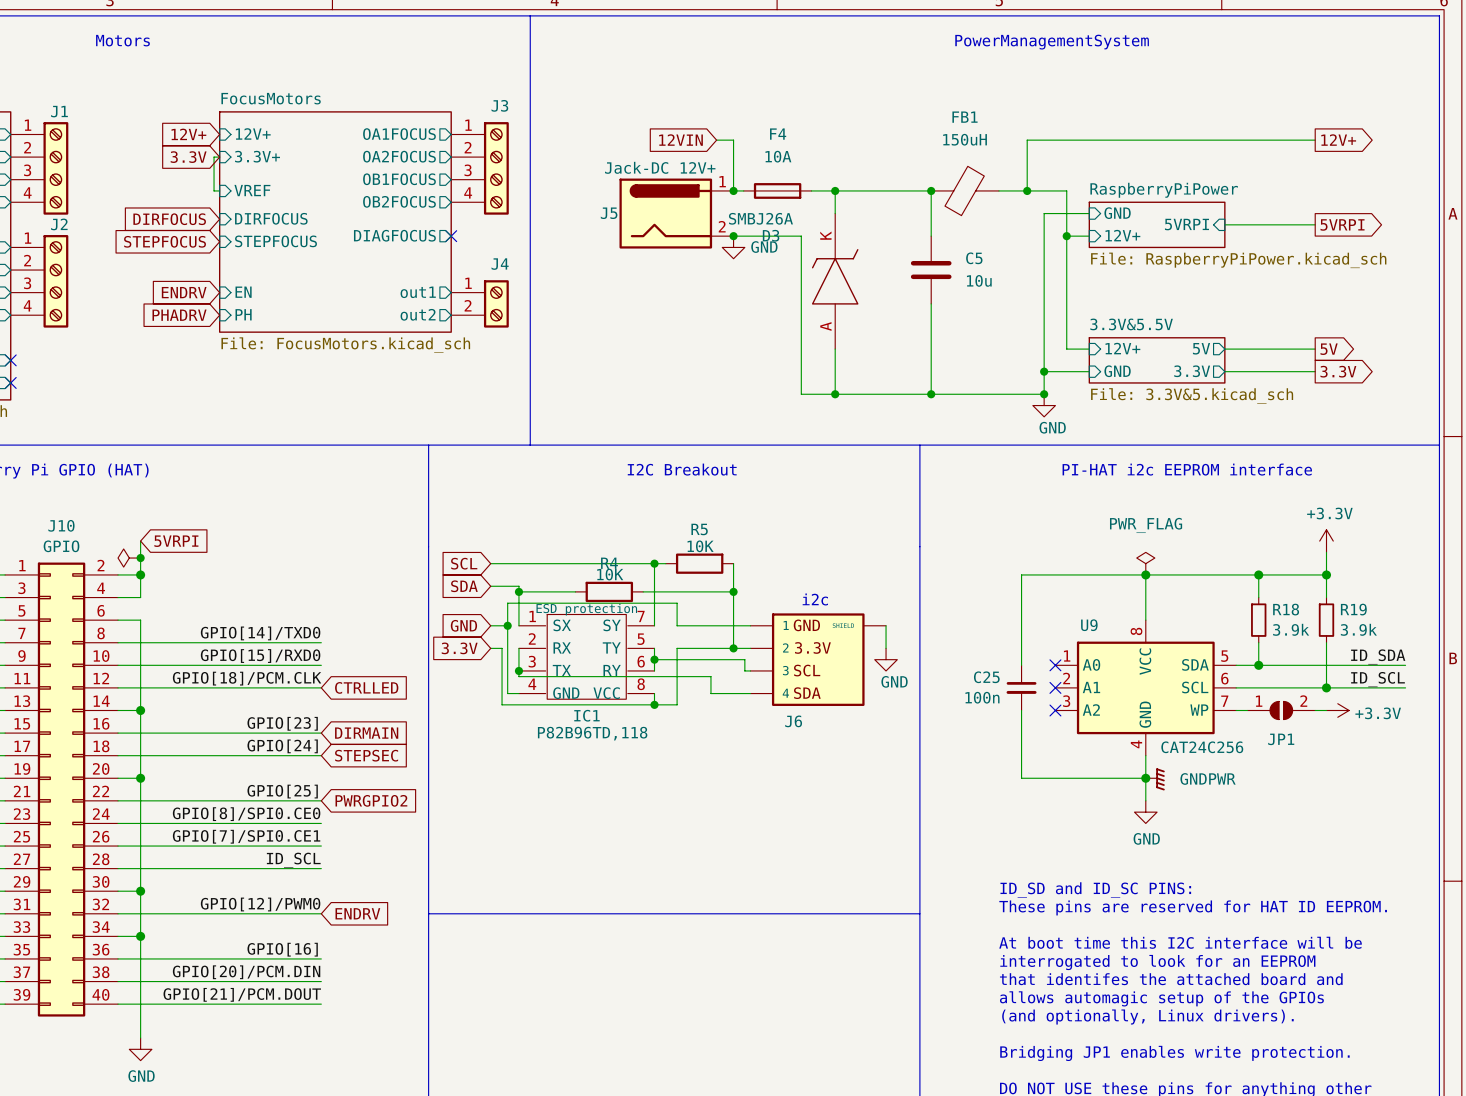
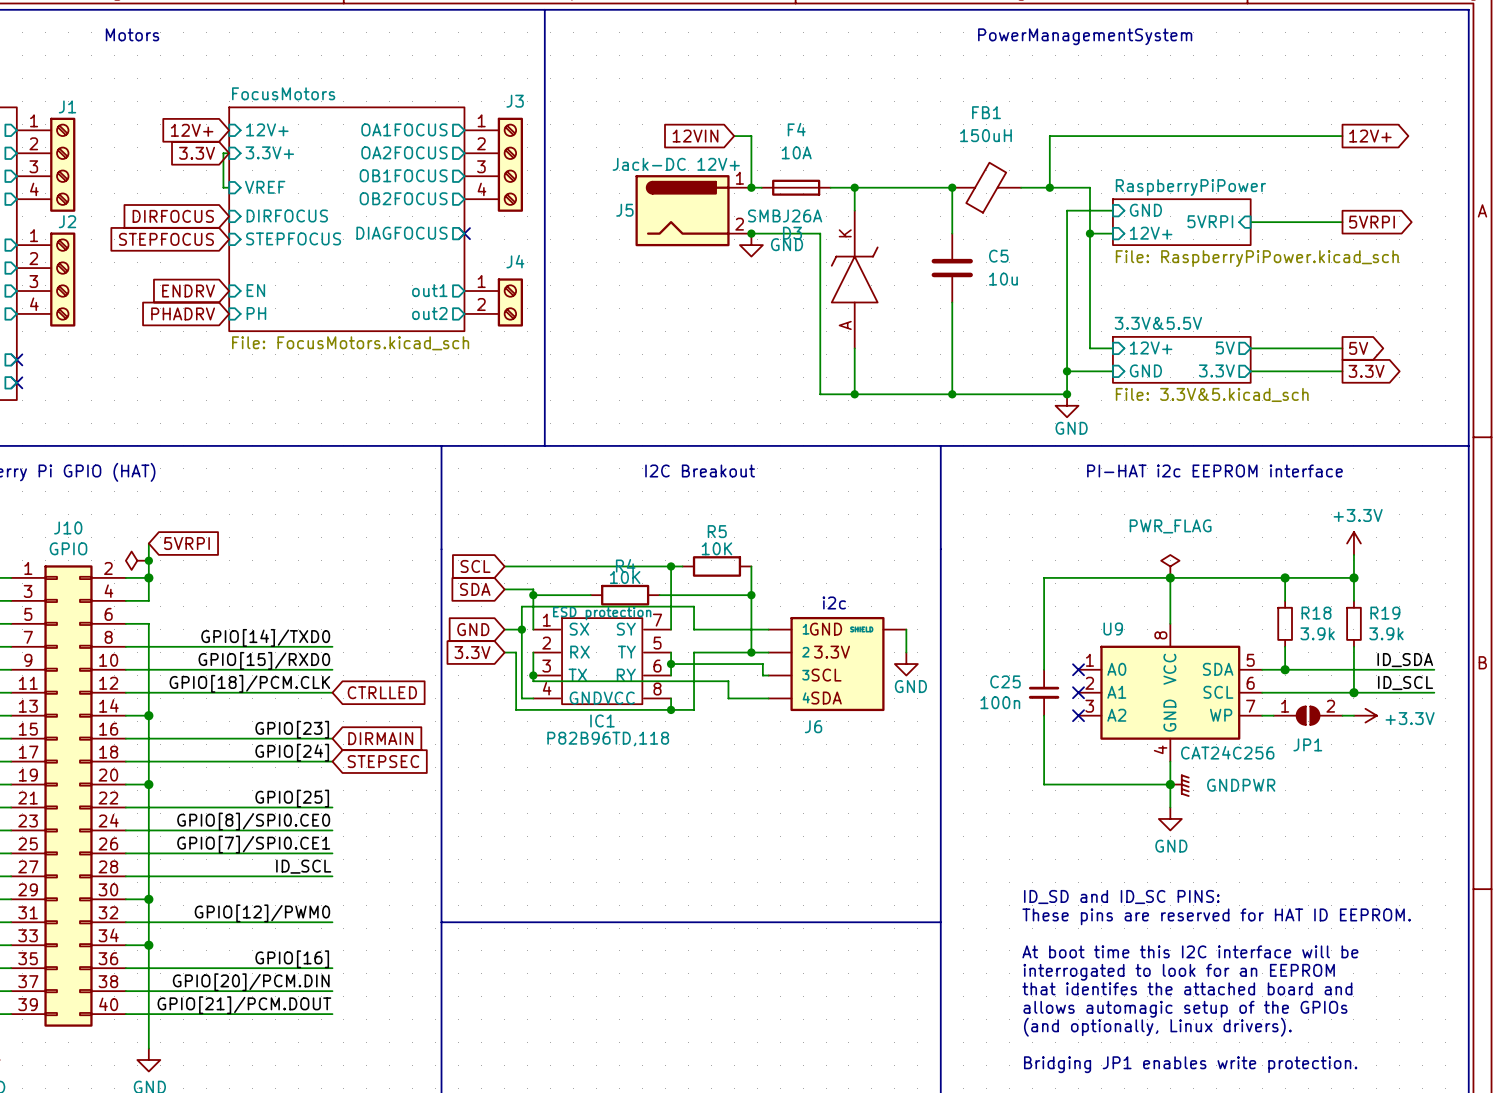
global label: PWRGPIO2 (371, 800) -> none
global label: ENDRV (357, 913) -> none

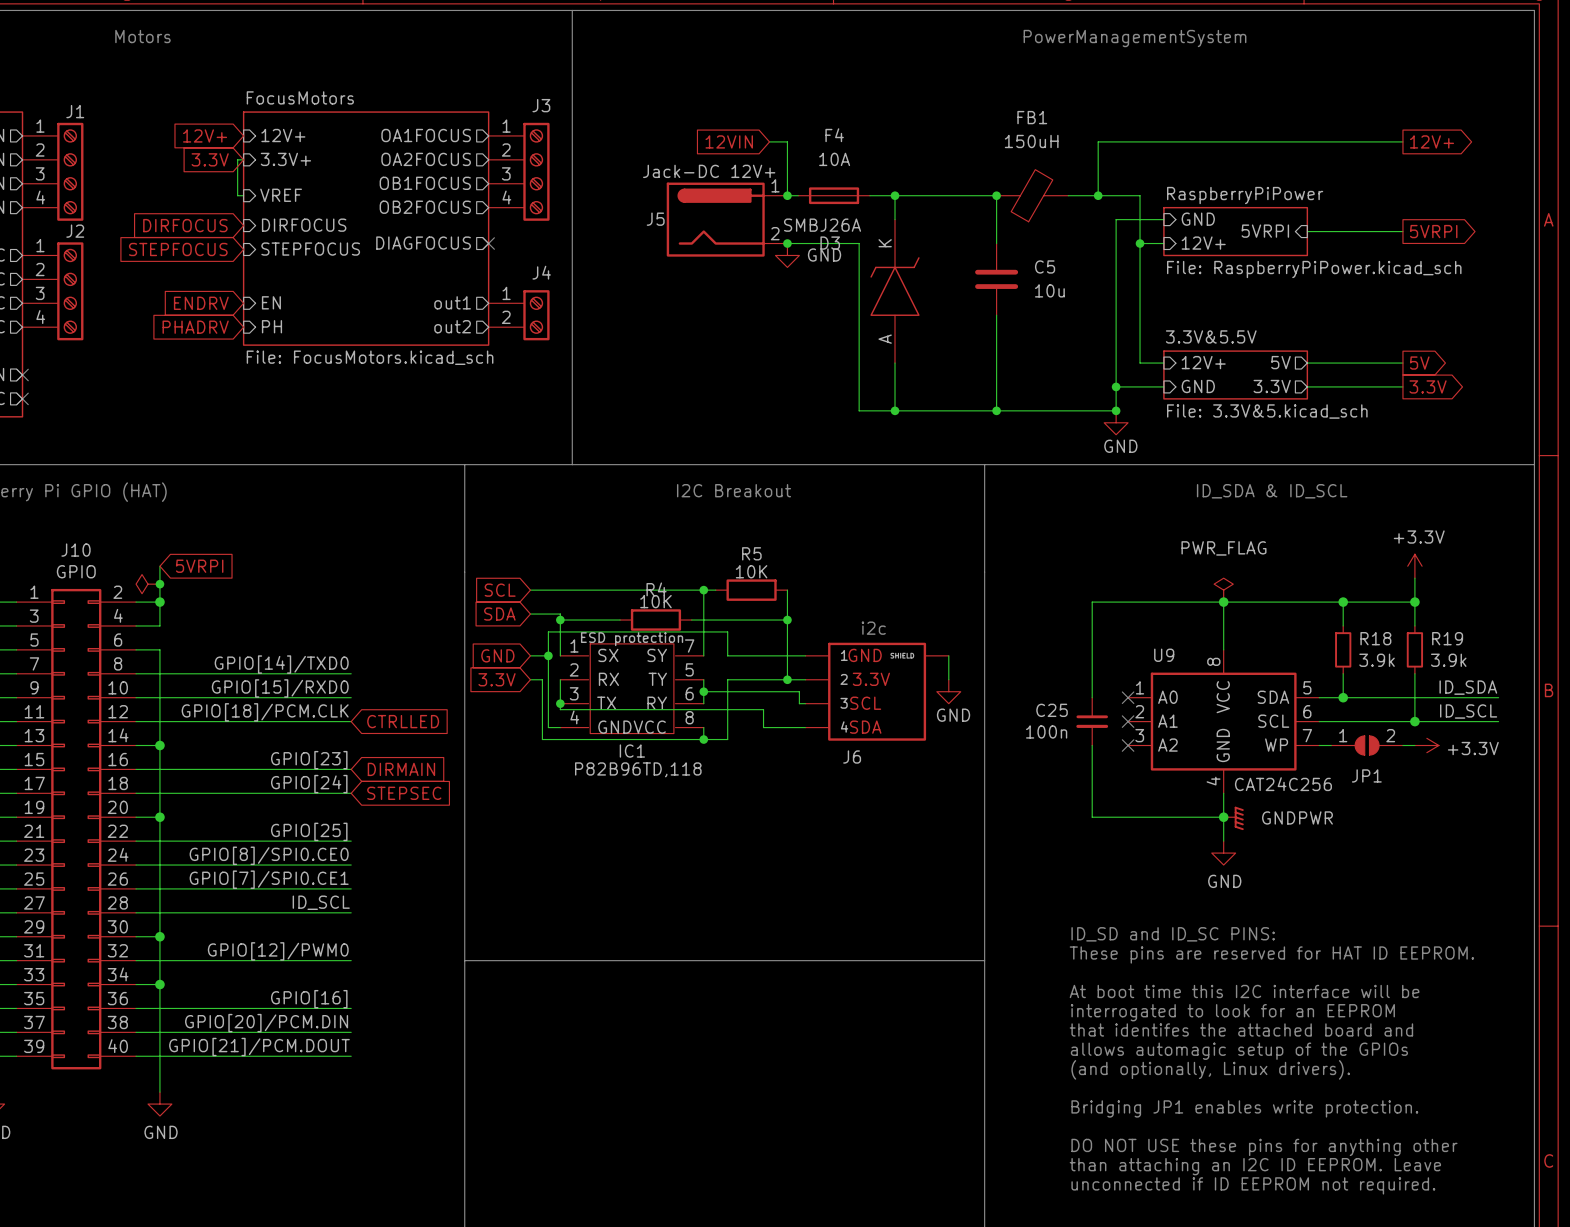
text: PI-HAT i2c EEPROM interface (1214, 470) -> none
text: none -> ID_SDA & ID_SCL (1272, 491)

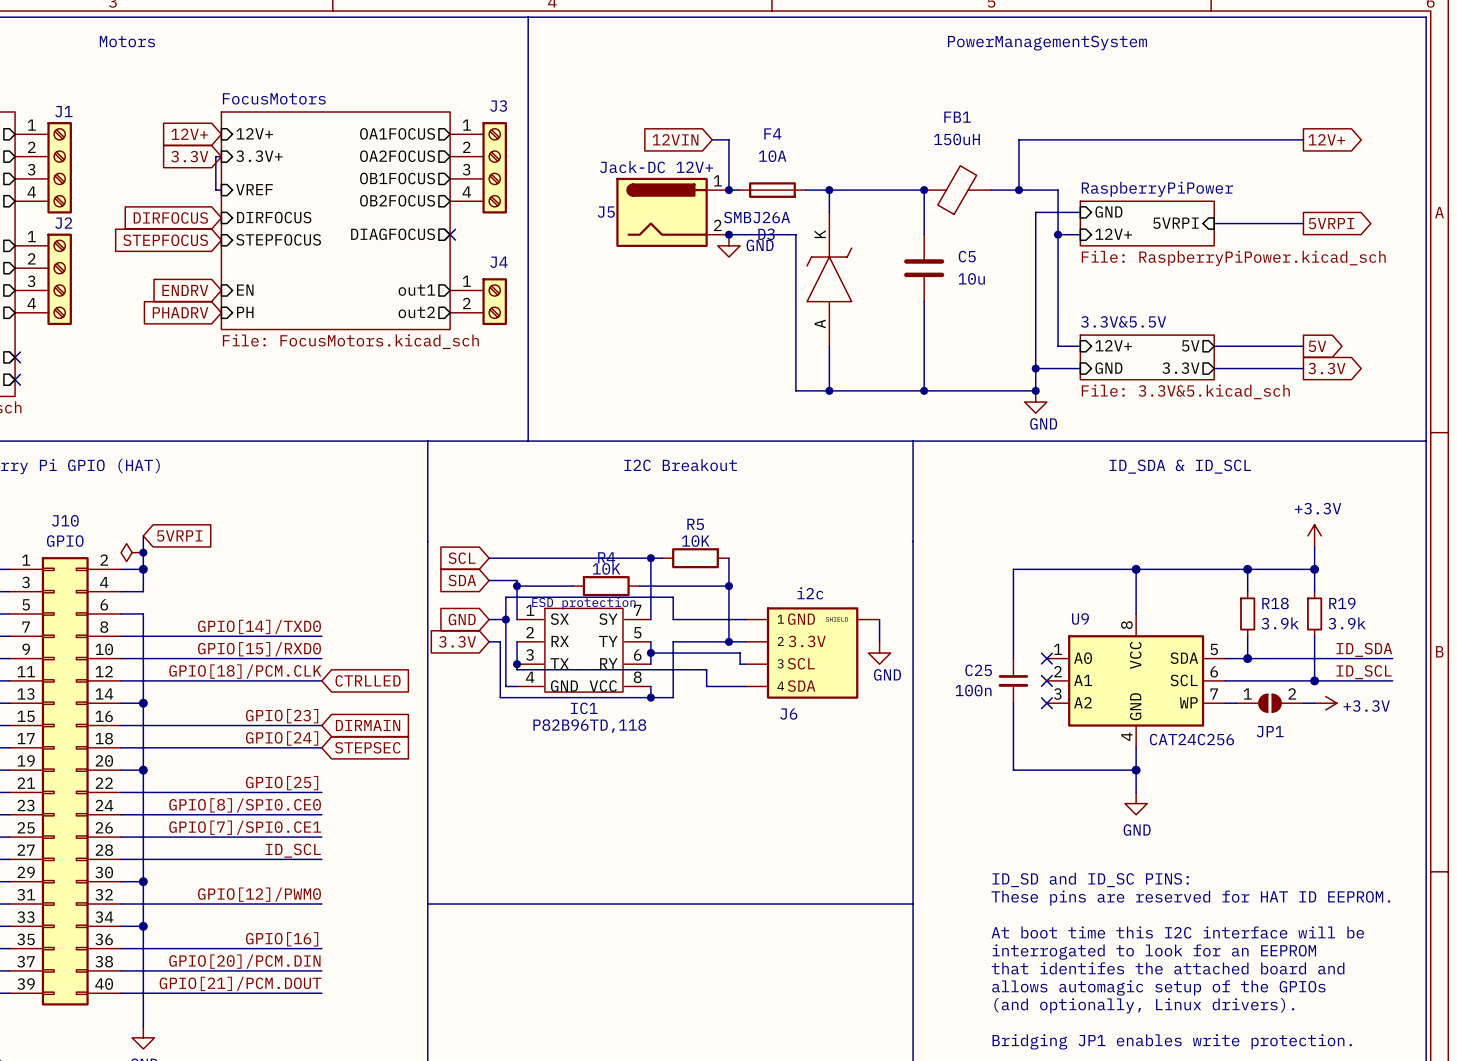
power symbol: PWR_FLAG (1223, 590) -> none
power symbol: GNDPWR (1233, 818) -> none

